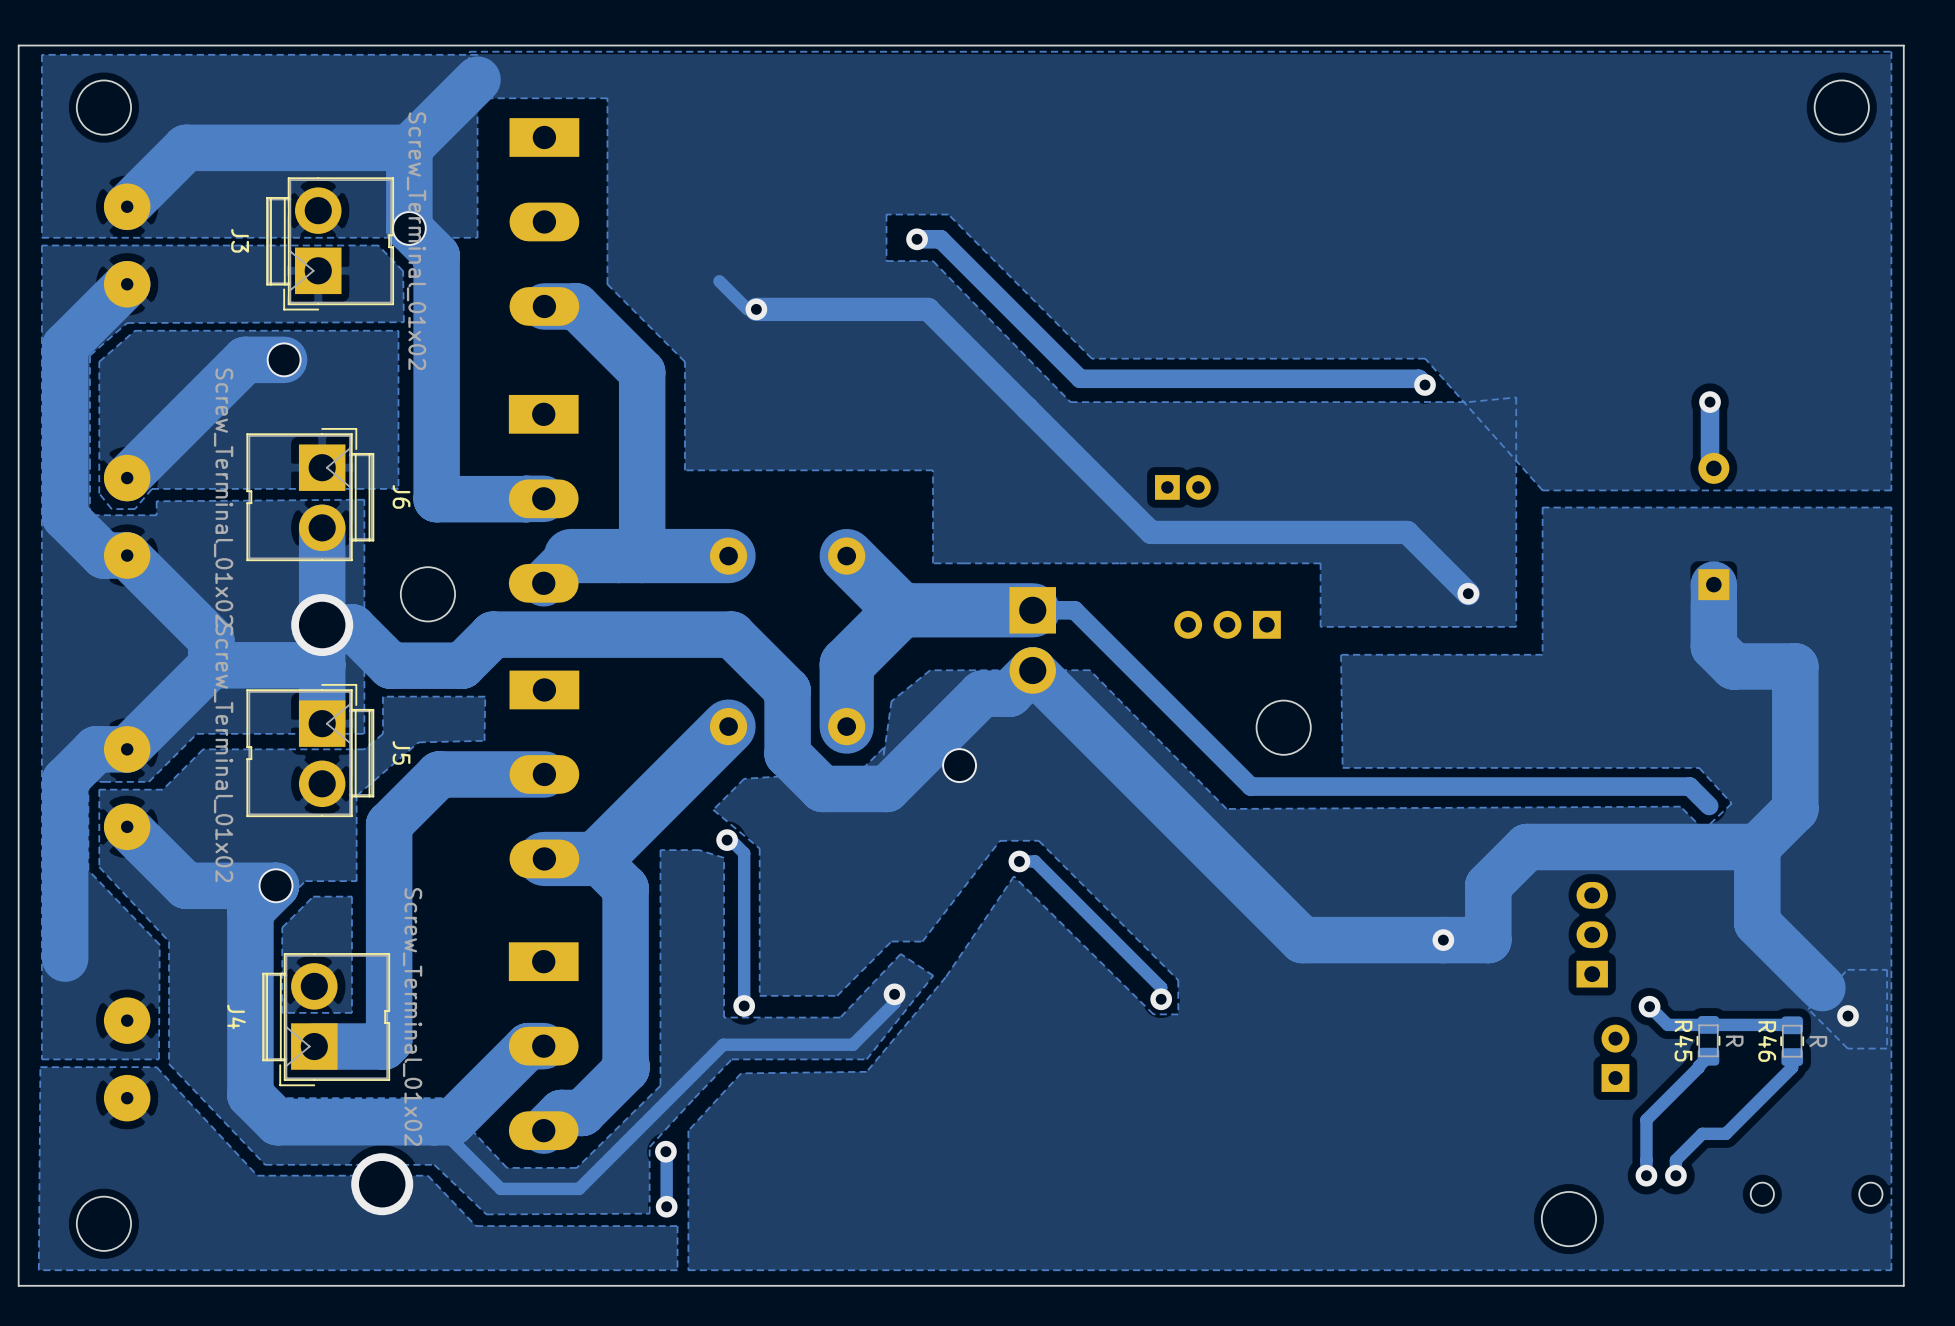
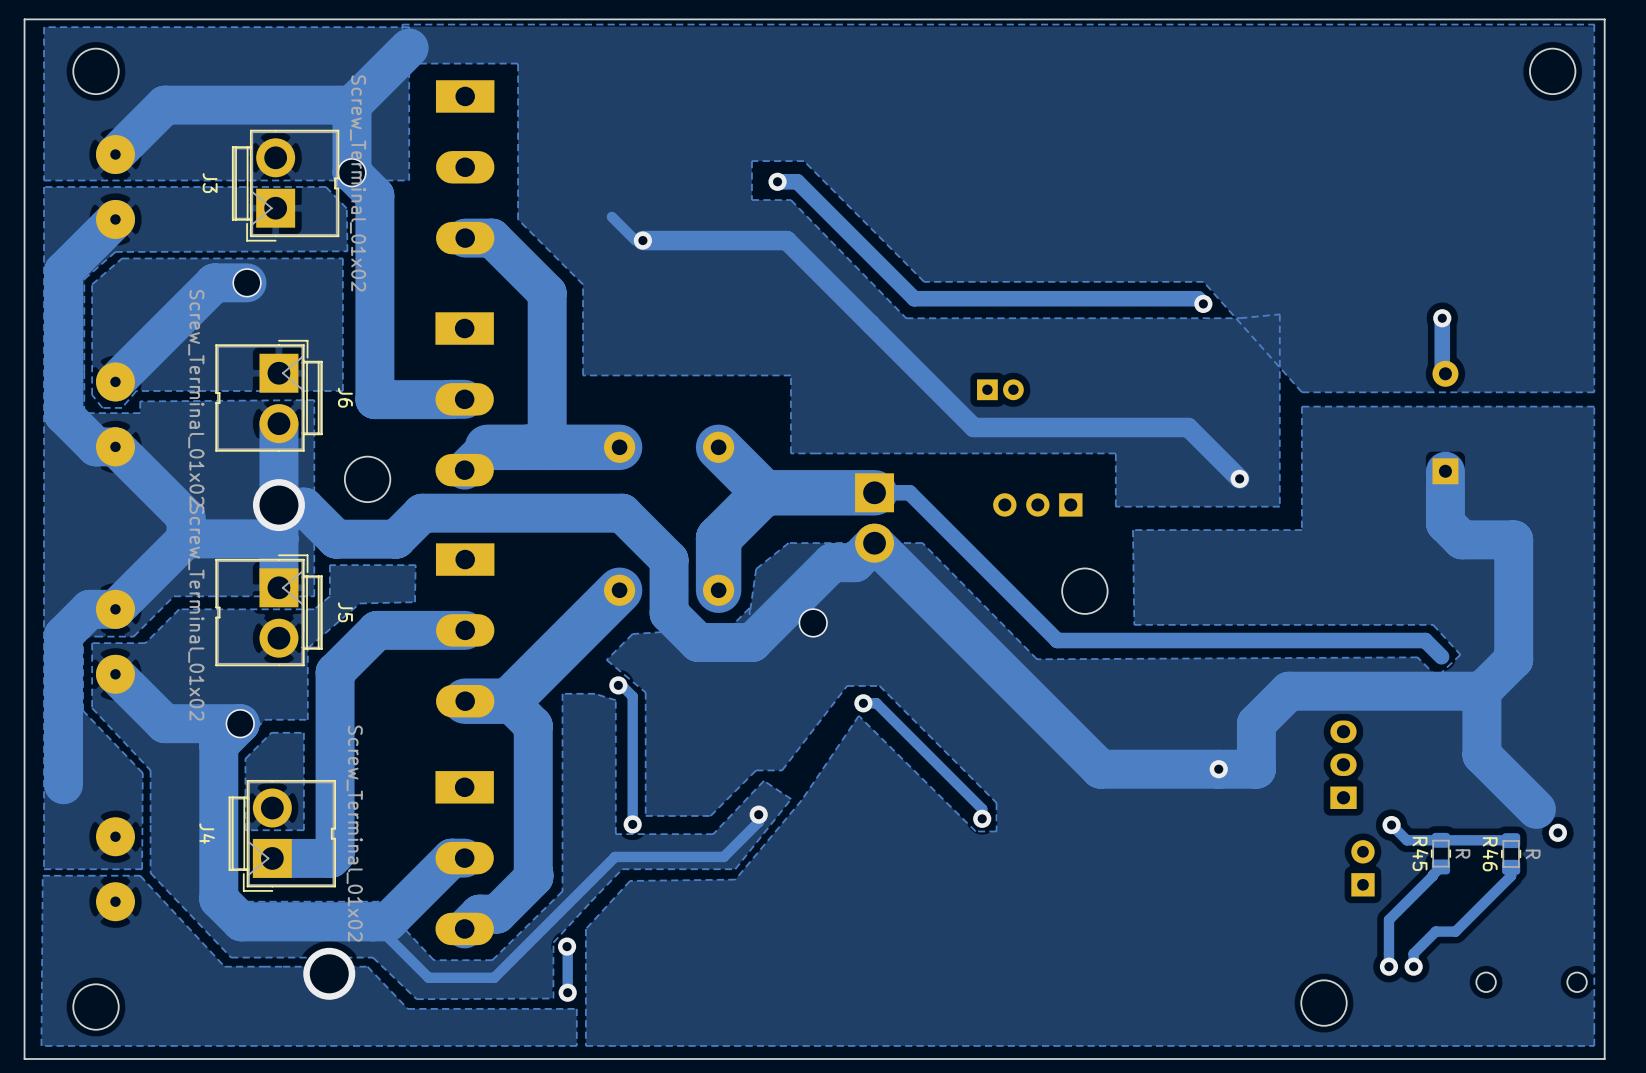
zone outline: (1887, 969) (1887, 1048) (1847, 1048) (1808, 1009) (1847, 969) (1887, 969) -> none

